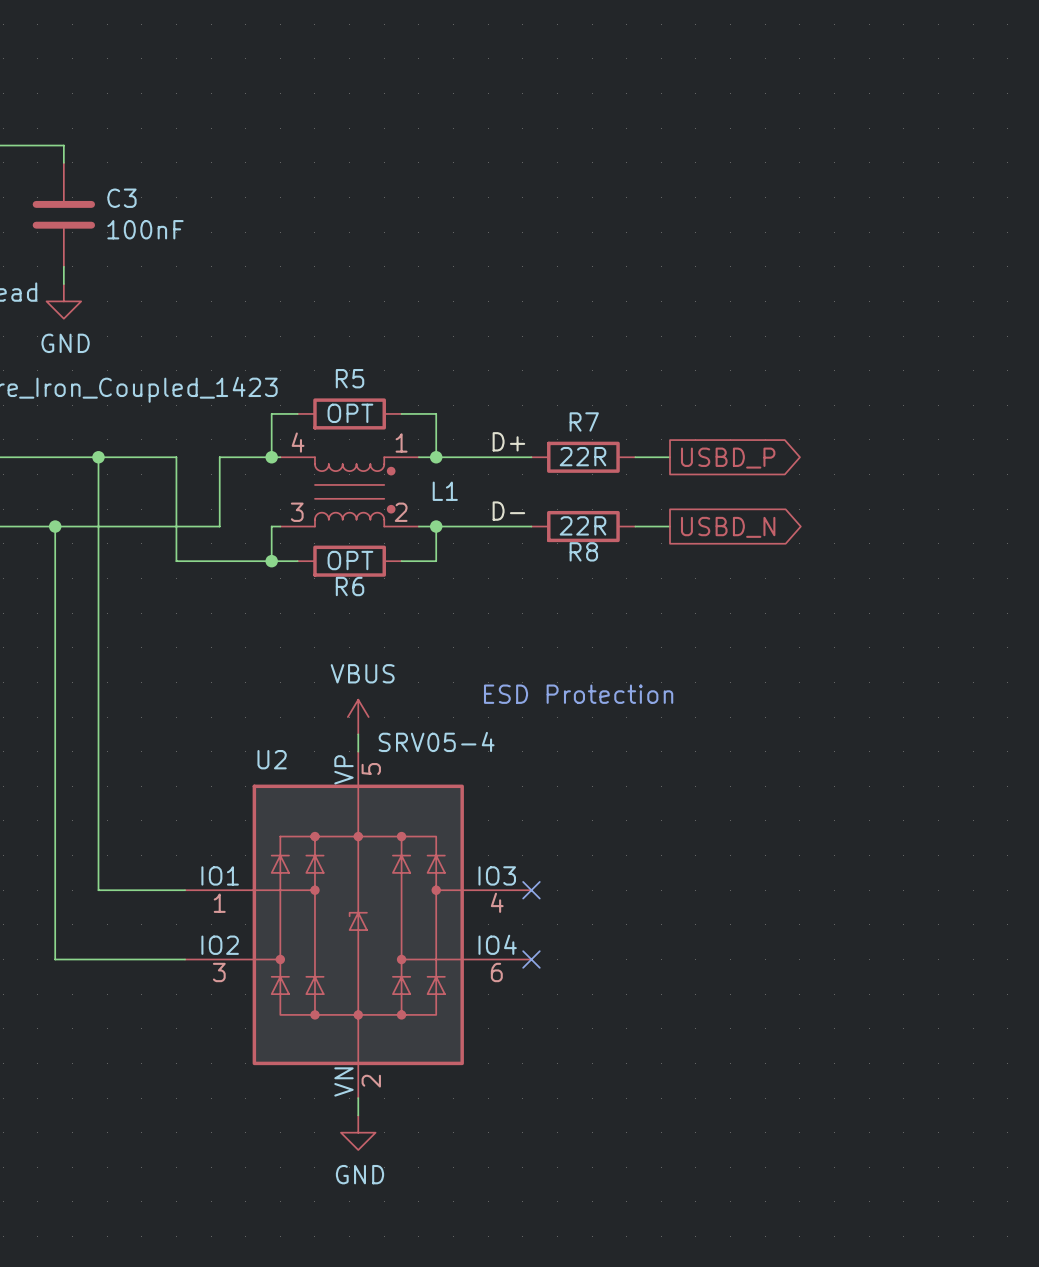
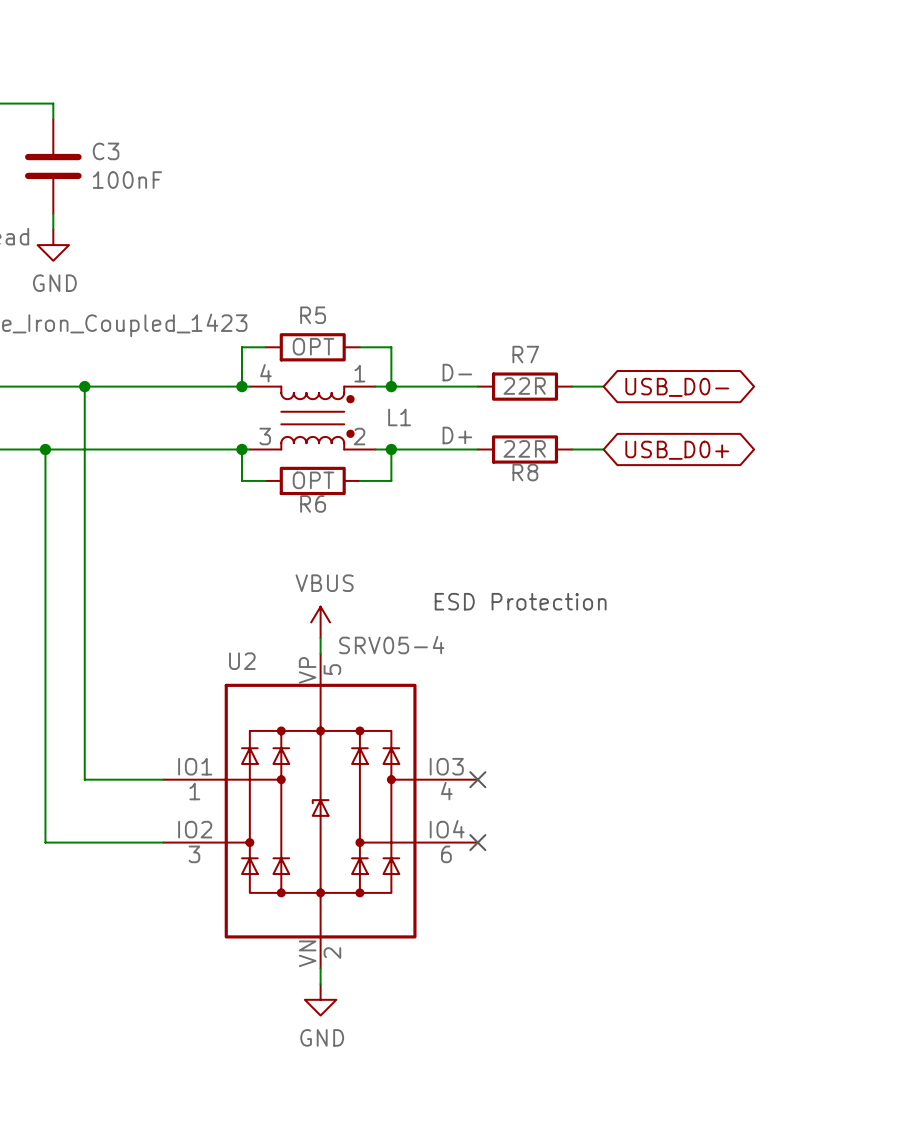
label: D+ (508, 441) -> D- (457, 372)
wire: (176, 457) (176, 561) (271, 561) -> none
wire: (219, 457) (219, 526) -> (194, 386) (155, 386)
global label shape: output (728, 458) -> bidirectional (677, 387)
global label: USBD_P (728, 458) -> USB_D0- (677, 387)
label: D- (508, 511) -> D+ (457, 435)
wire: none -> (194, 449) (241, 449)
global label shape: output (728, 527) -> bidirectional (677, 450)
global label: USBD_N (728, 527) -> USB_D0+ (677, 450)
junction position: (271, 561) -> (241, 449)

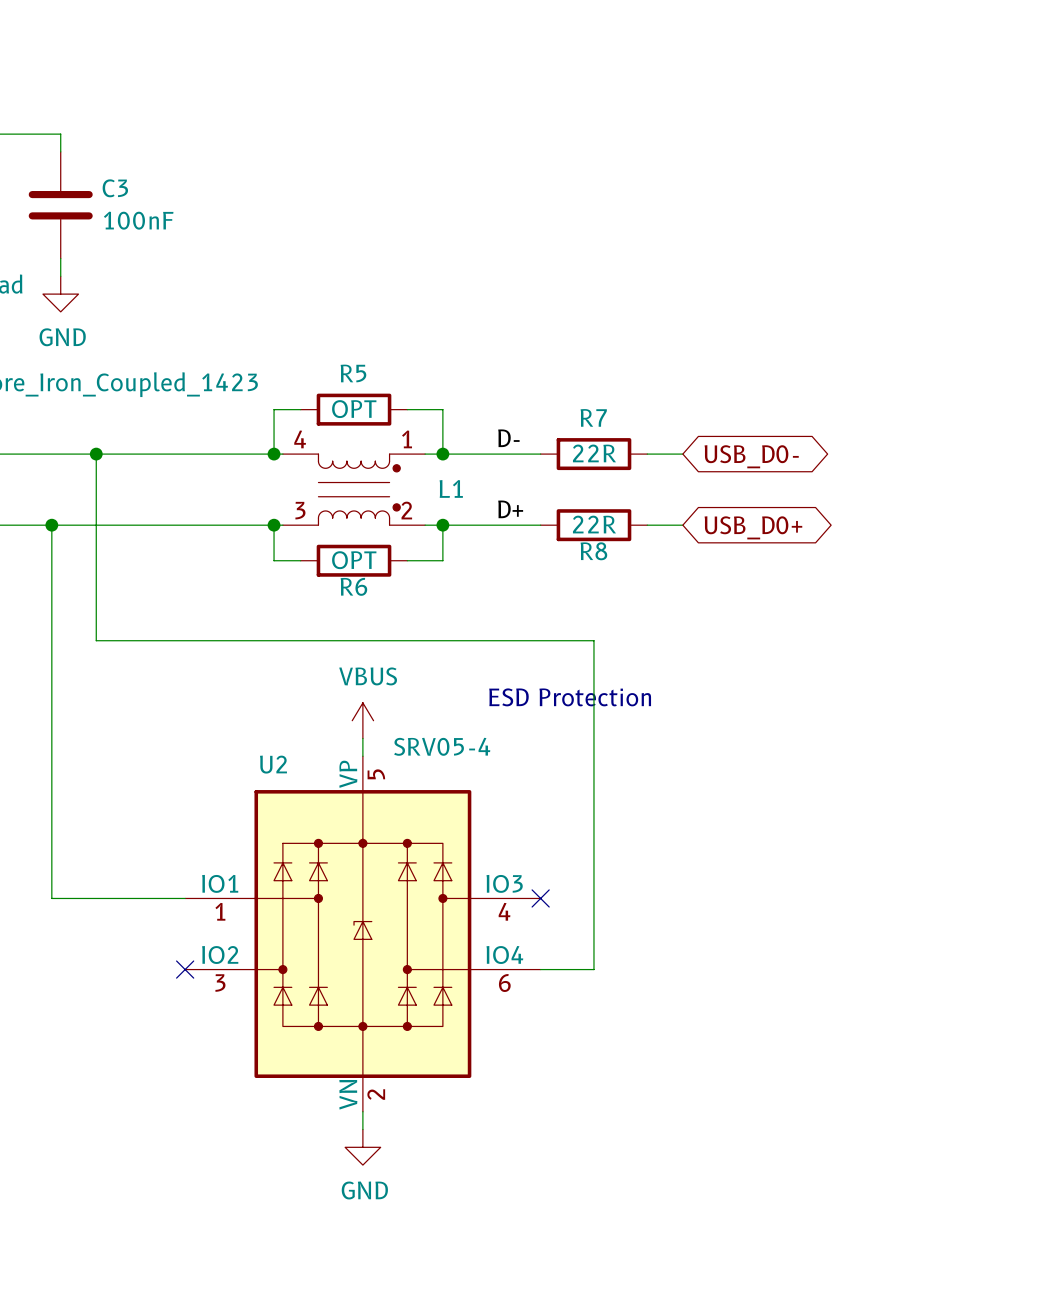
wire: (84, 551) (84, 779) -> (96, 640) (593, 640) (593, 969) (540, 969)
wire: (45, 779) (45, 842) (163, 842) -> (51, 898) (96, 898)
no-connect mark: none -> (185, 969)
no-connect mark: (477, 842) -> none

